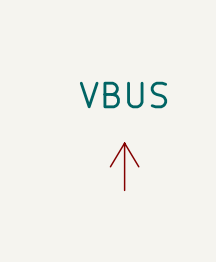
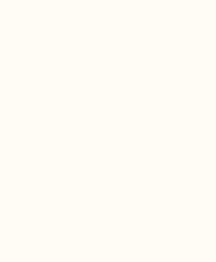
power symbol: VBUS (124, 166) -> none

